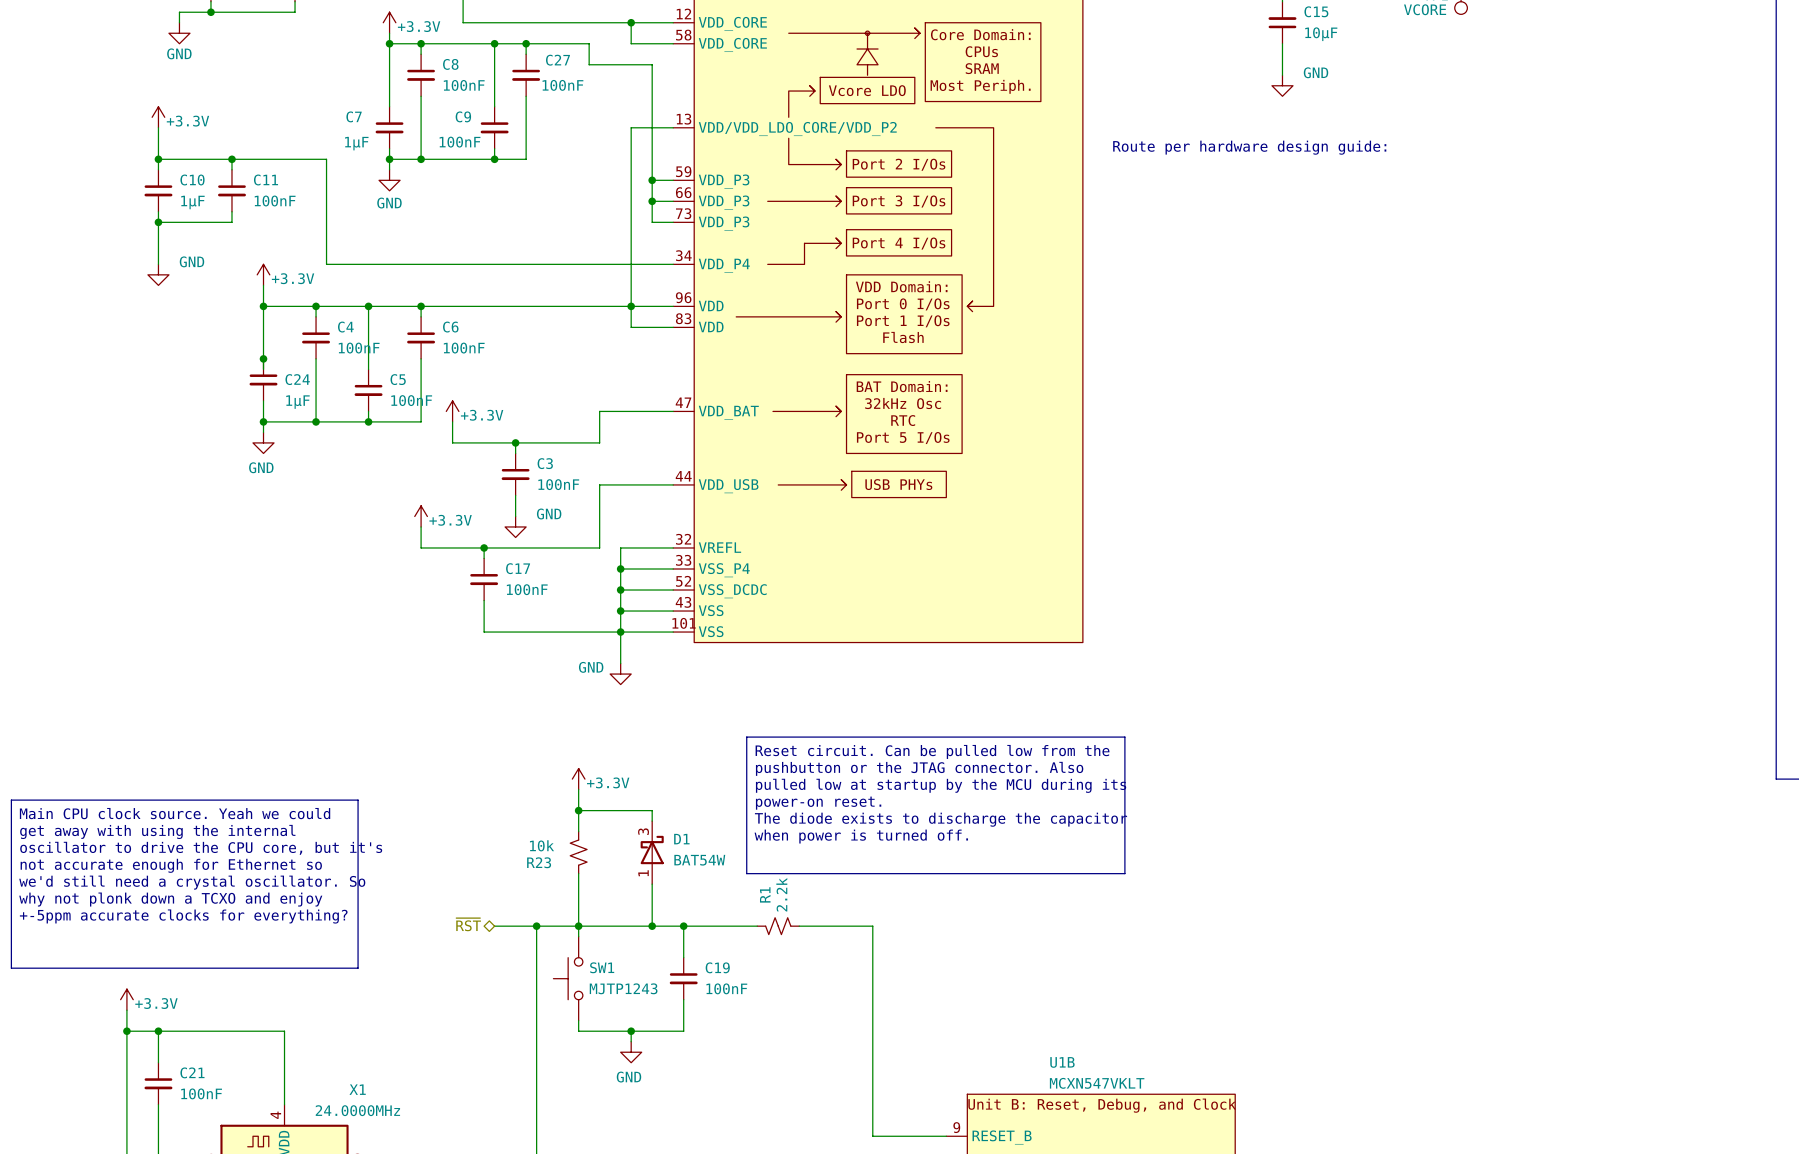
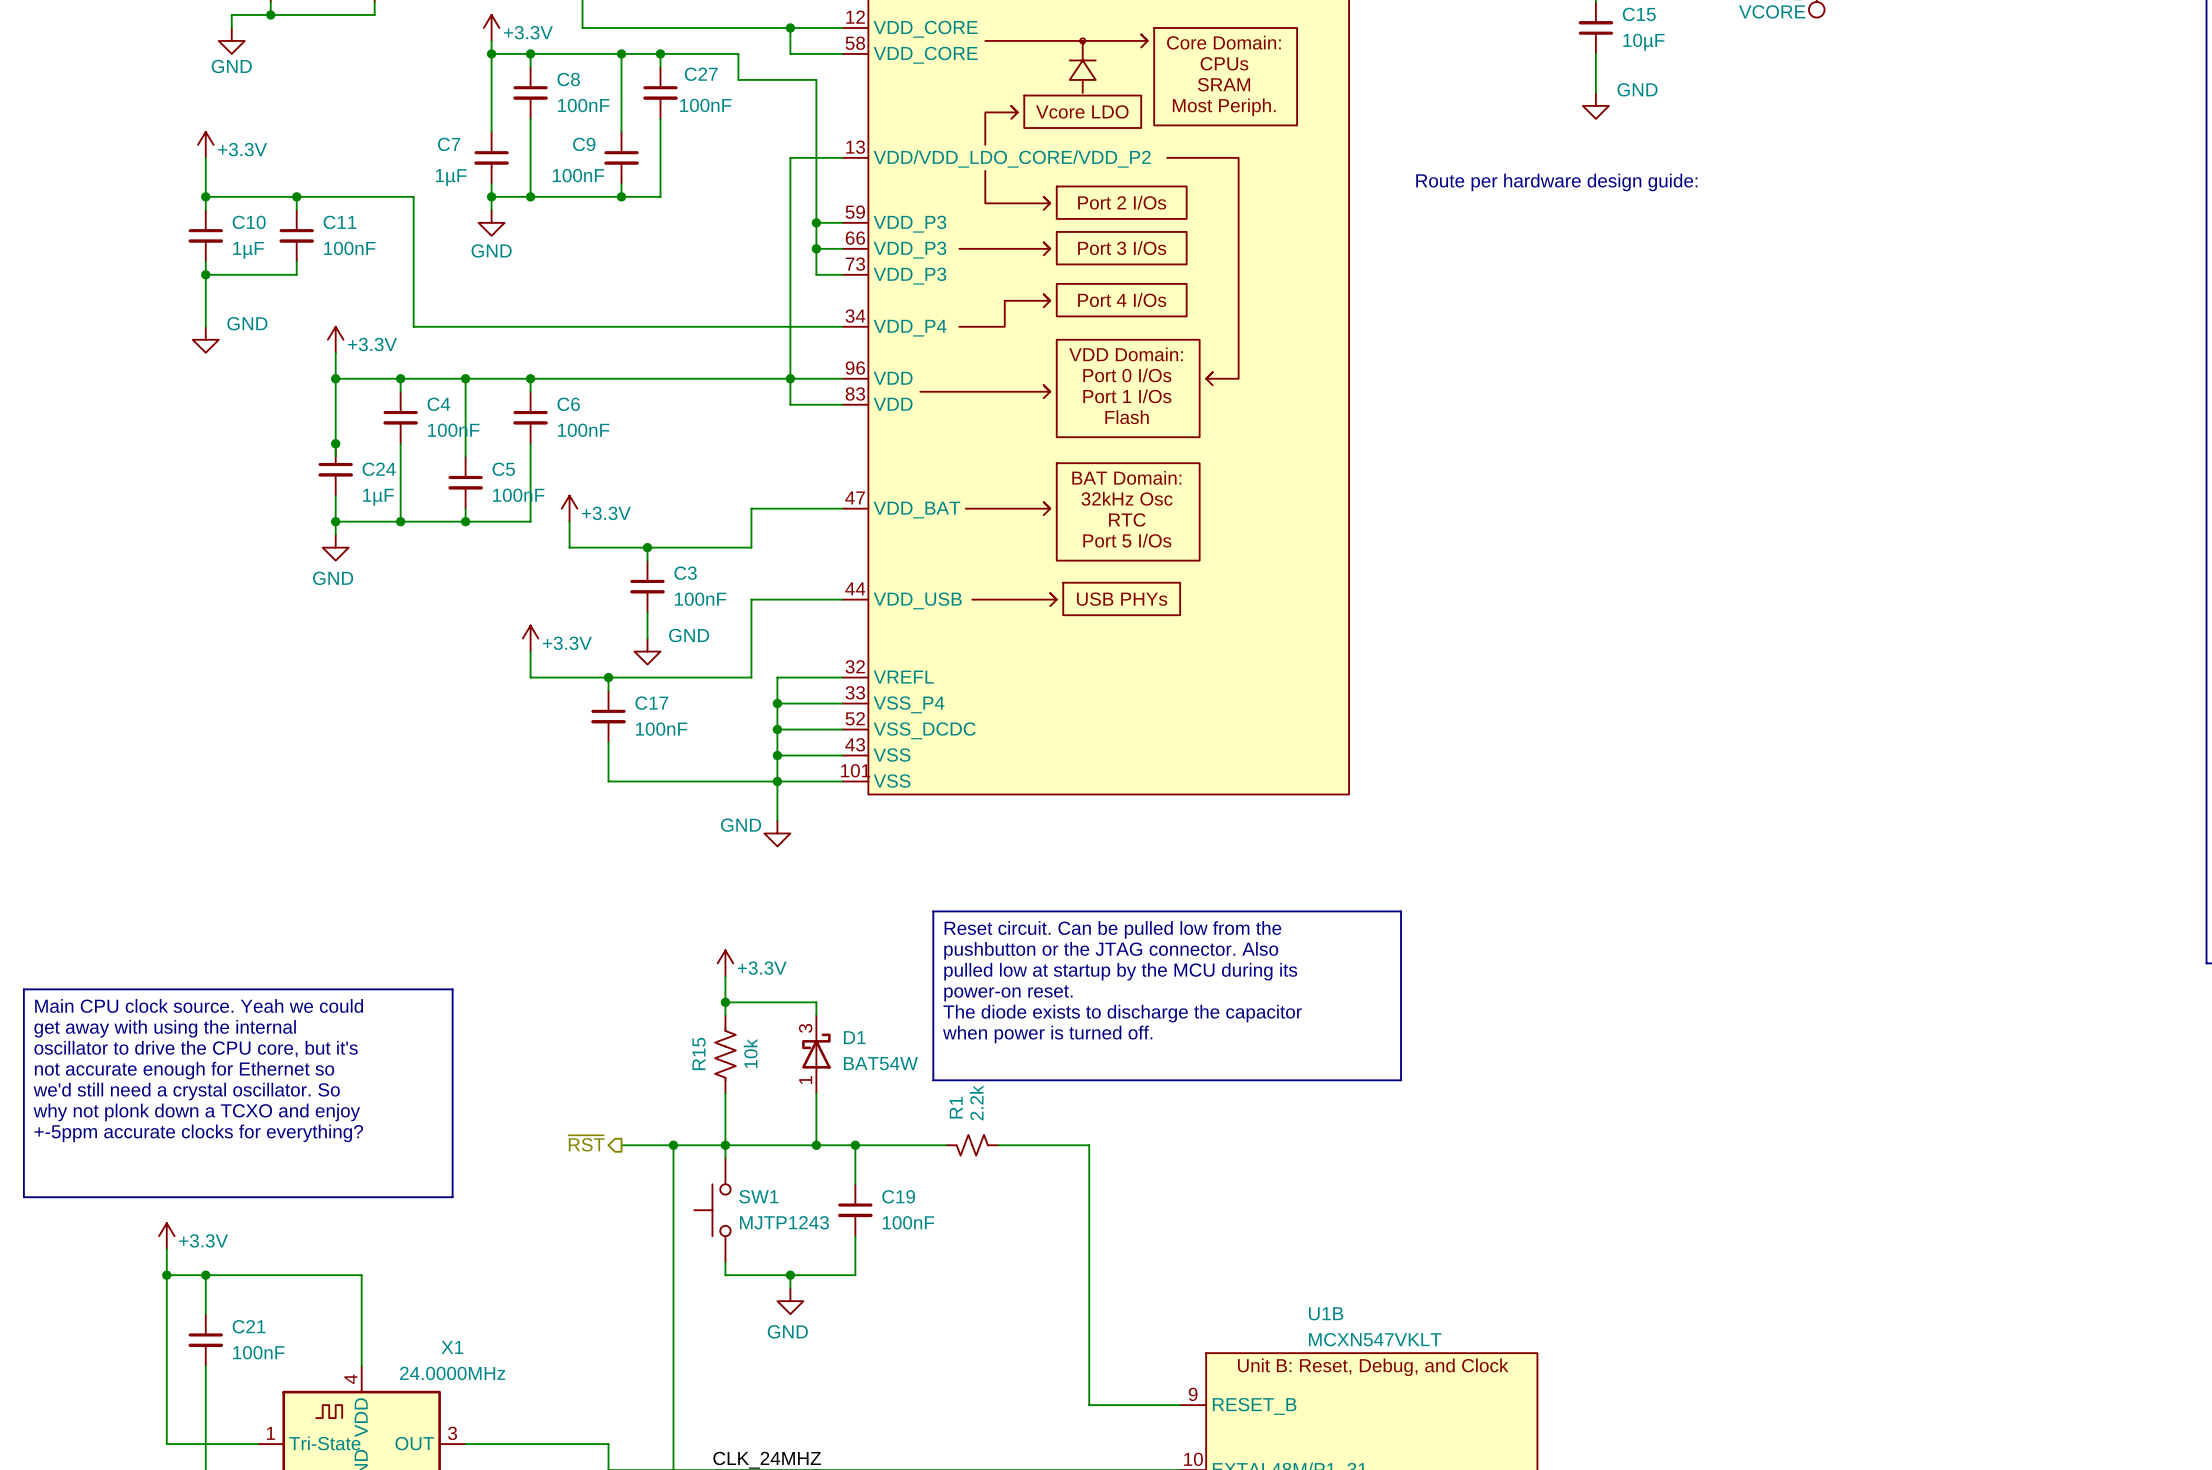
R23: 10k (578, 852) -> none
R15: none -> 10k (725, 1054)
hierarchical label shape: bidirectional (468, 924) -> output (586, 1143)

